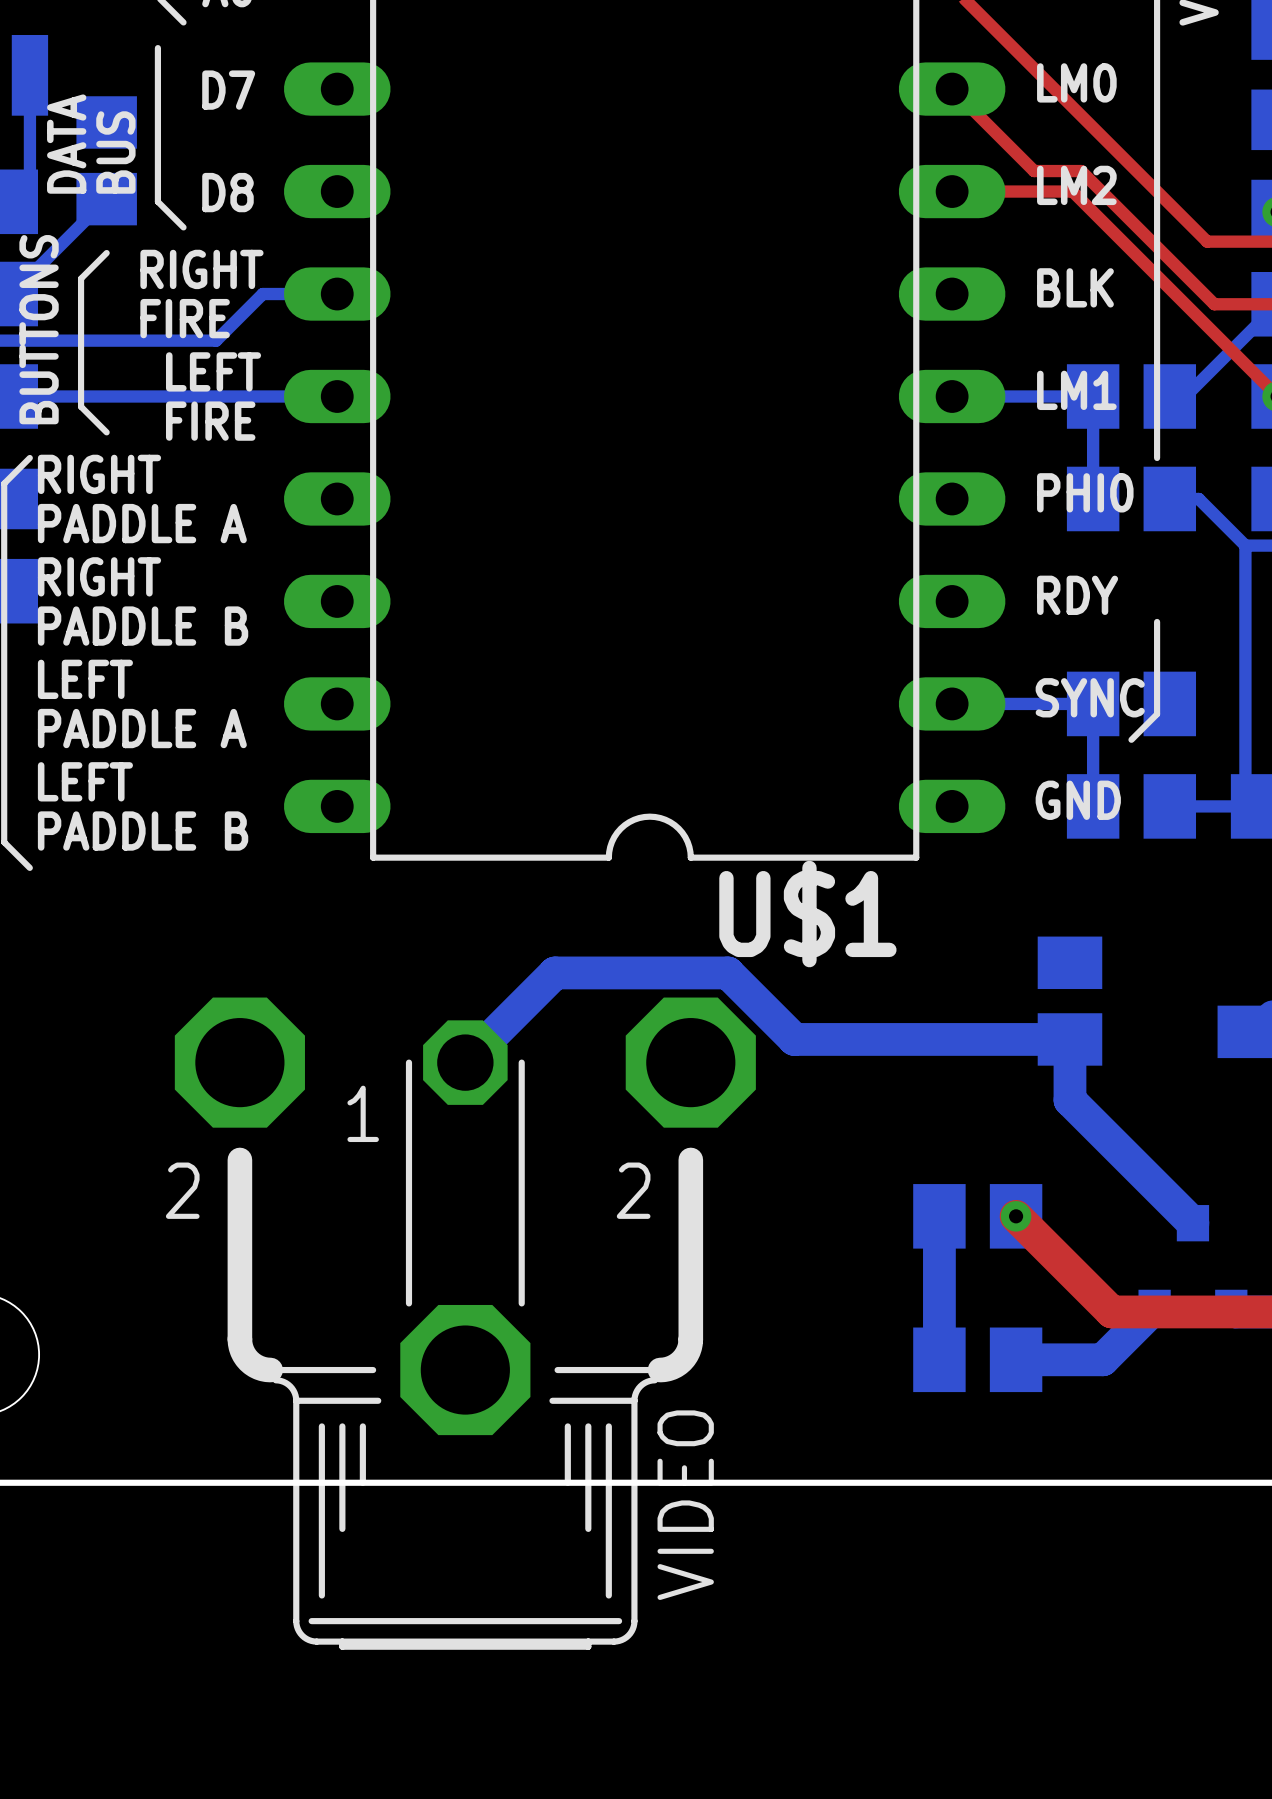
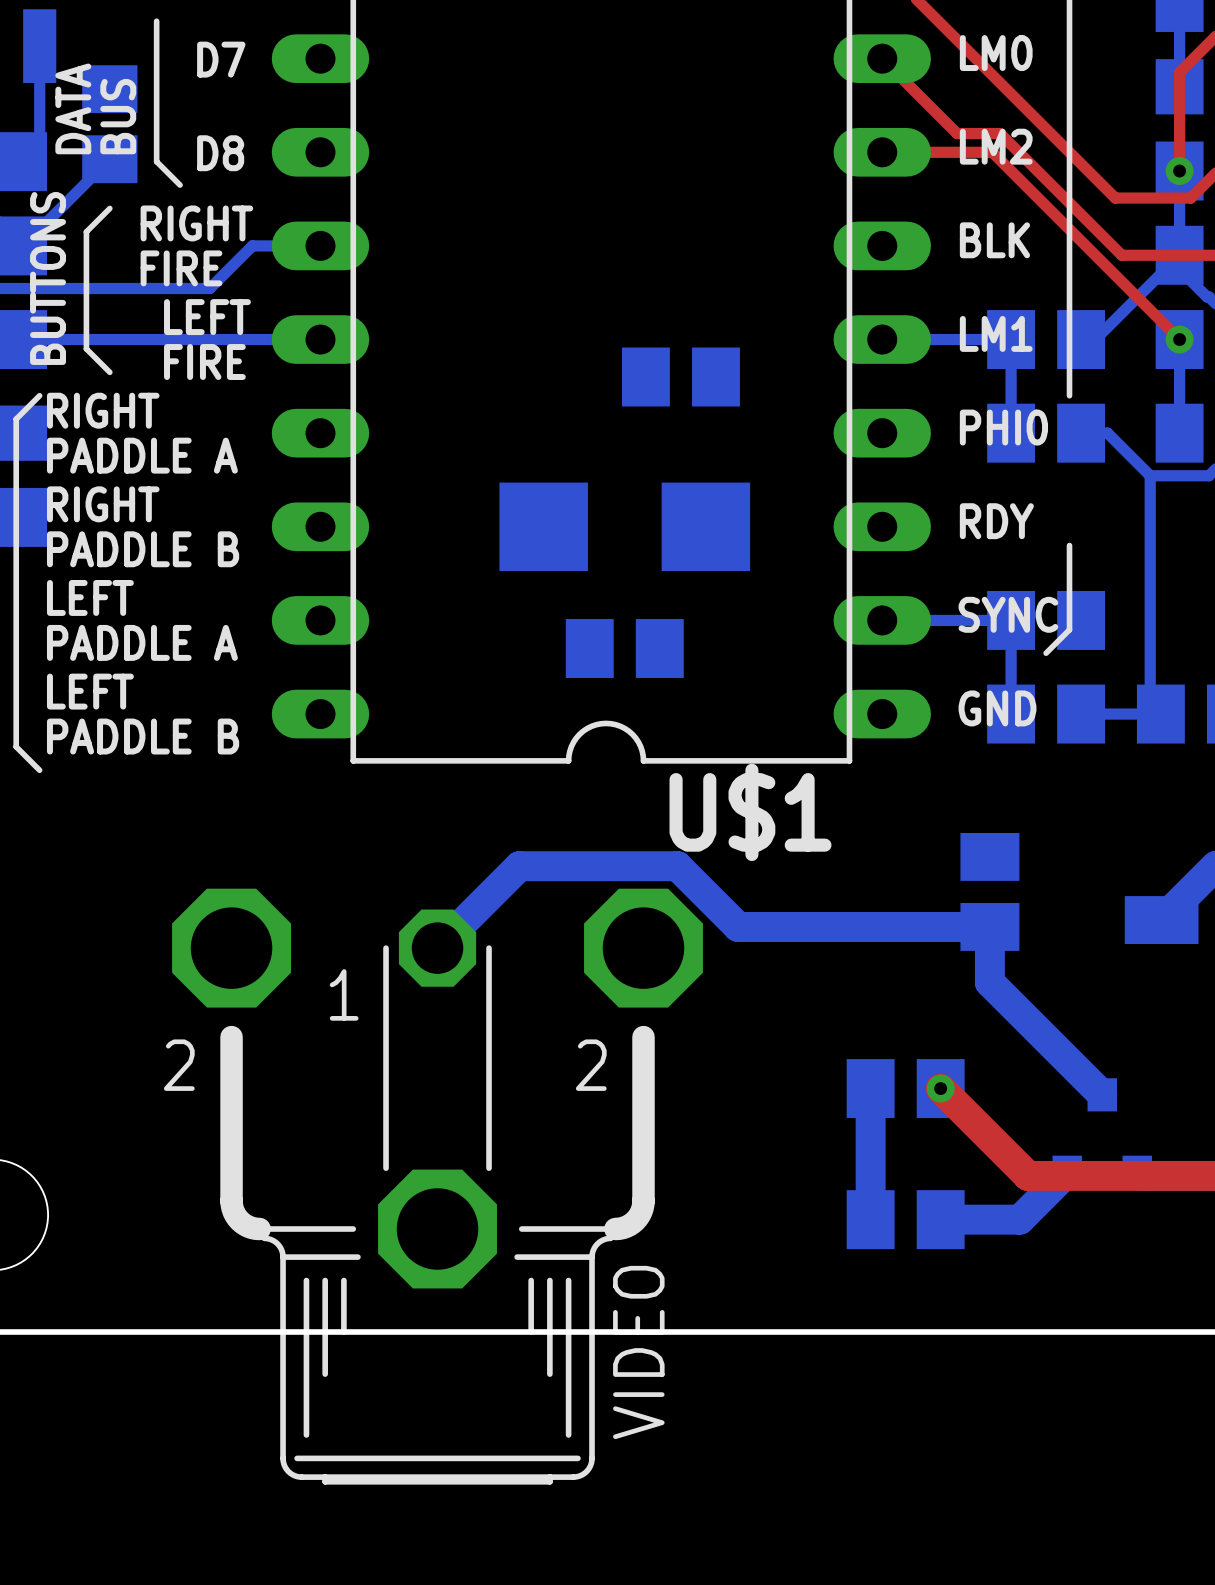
part: none -> (680, 377)
part: none -> (624, 526)
part: none -> (624, 648)

